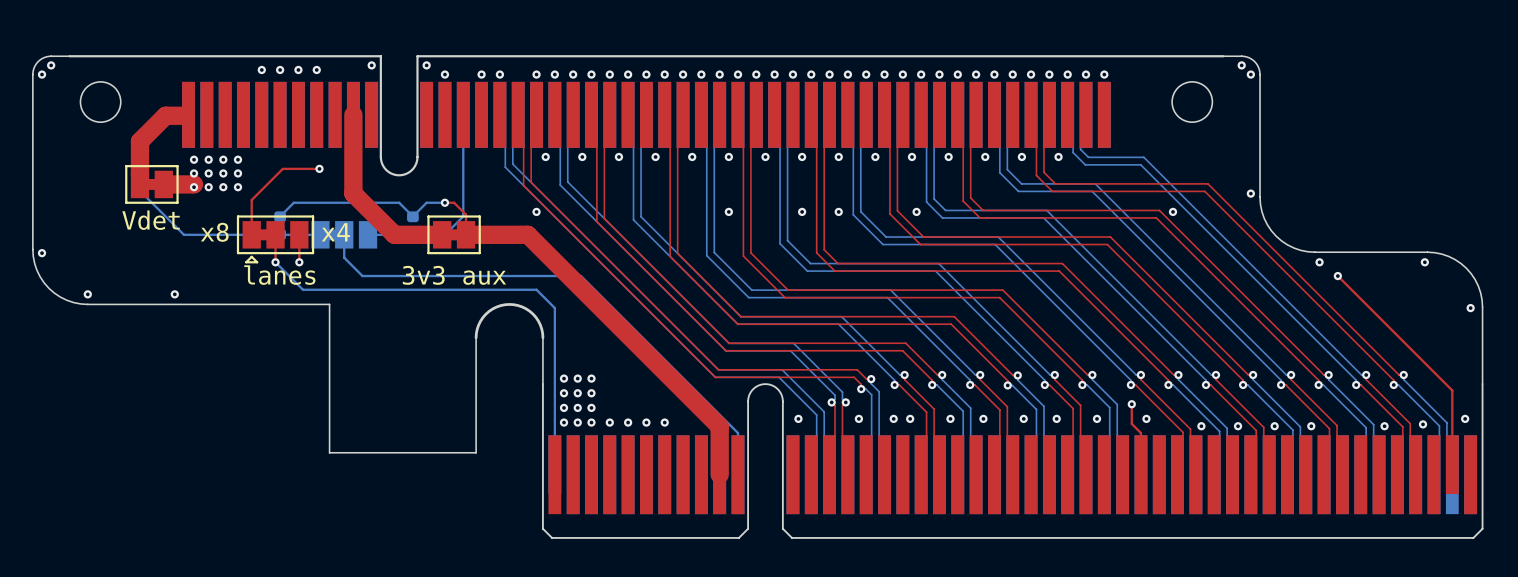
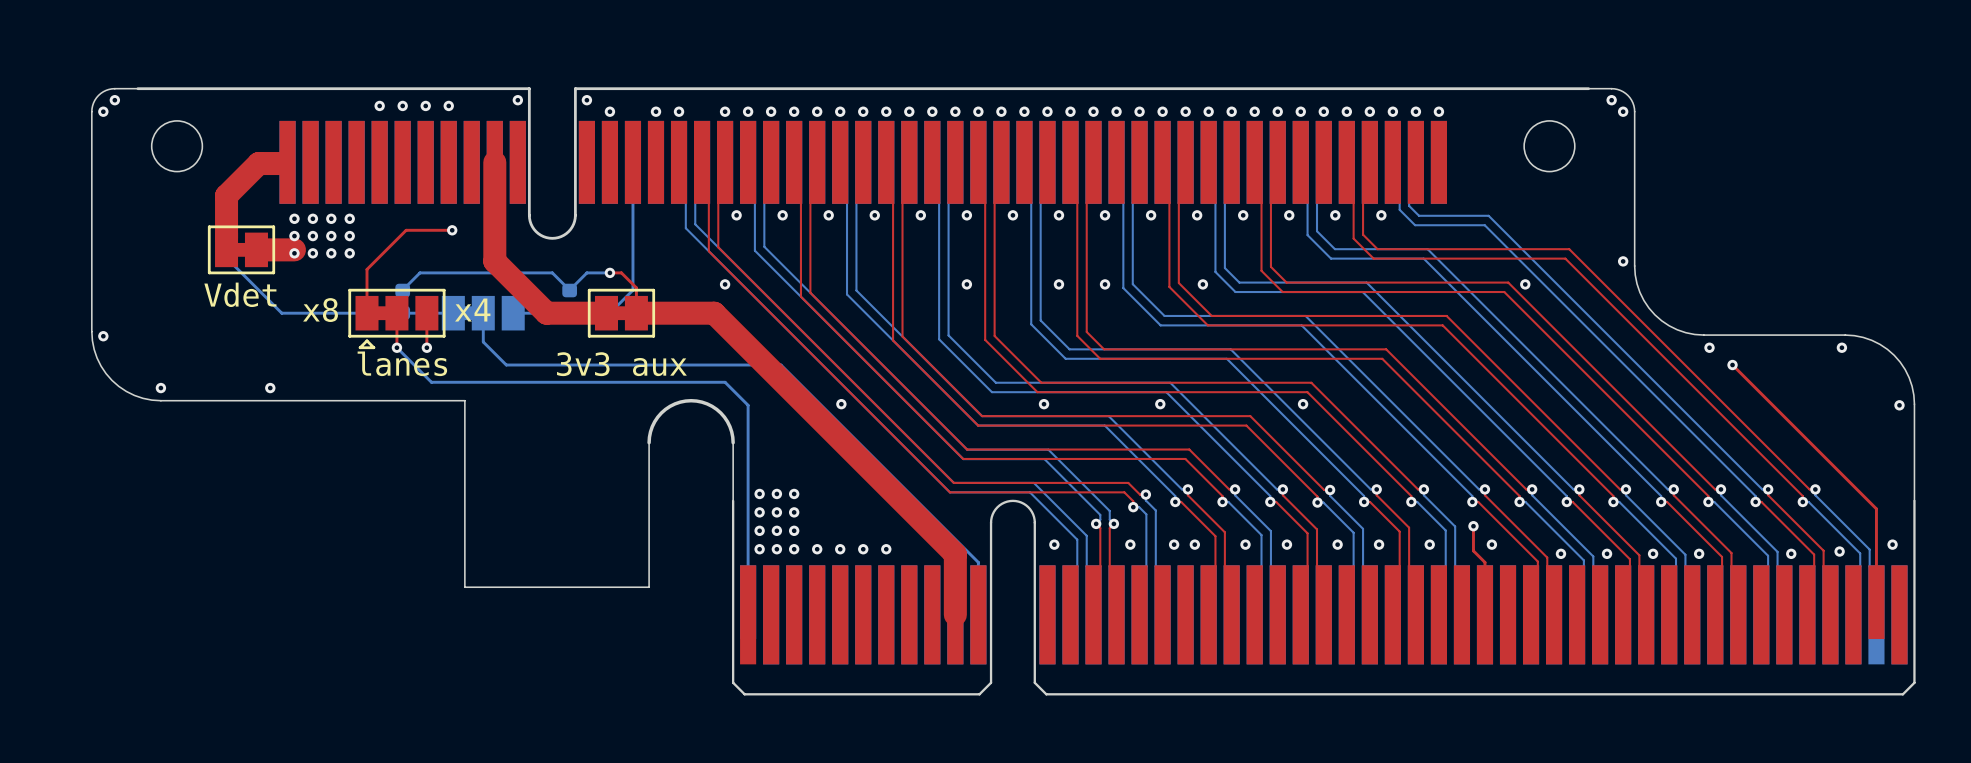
via: none -> (841, 404)
via: none -> (1044, 404)
via: none -> (1160, 404)
via: none -> (1303, 404)

